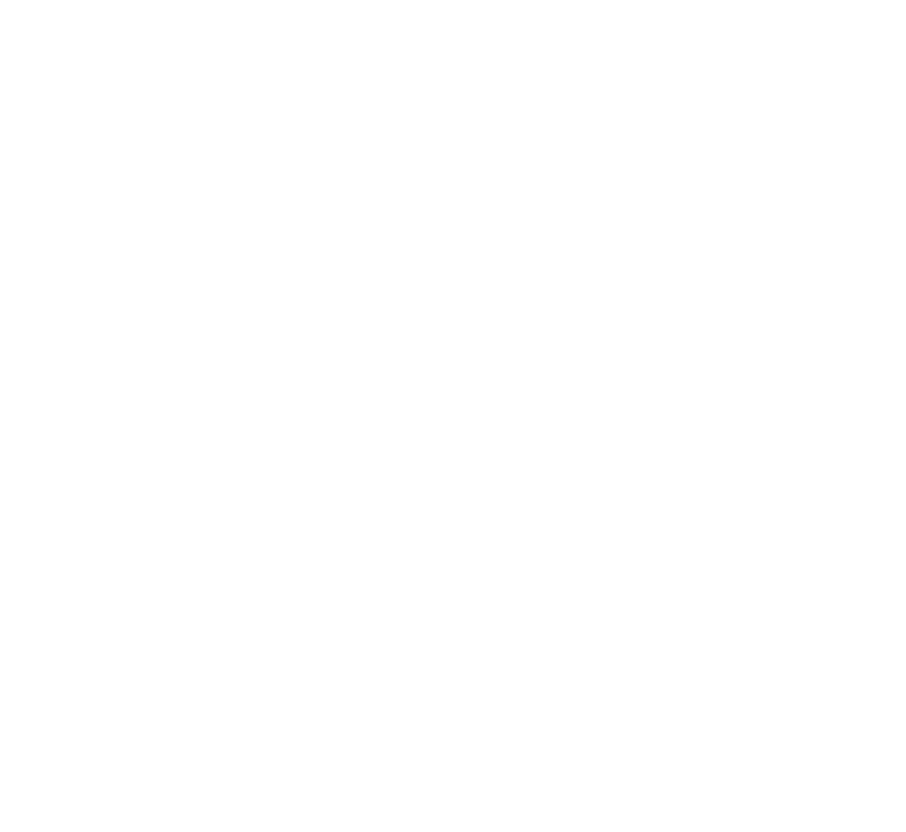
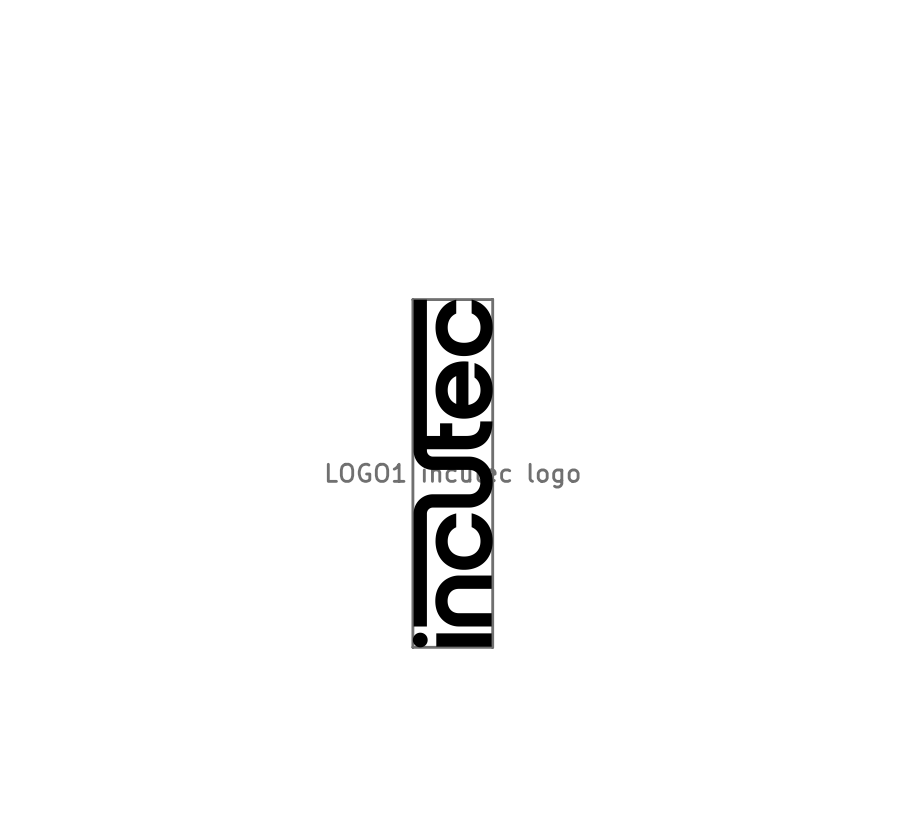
drawing: none -> [411, 298, 495, 649]

